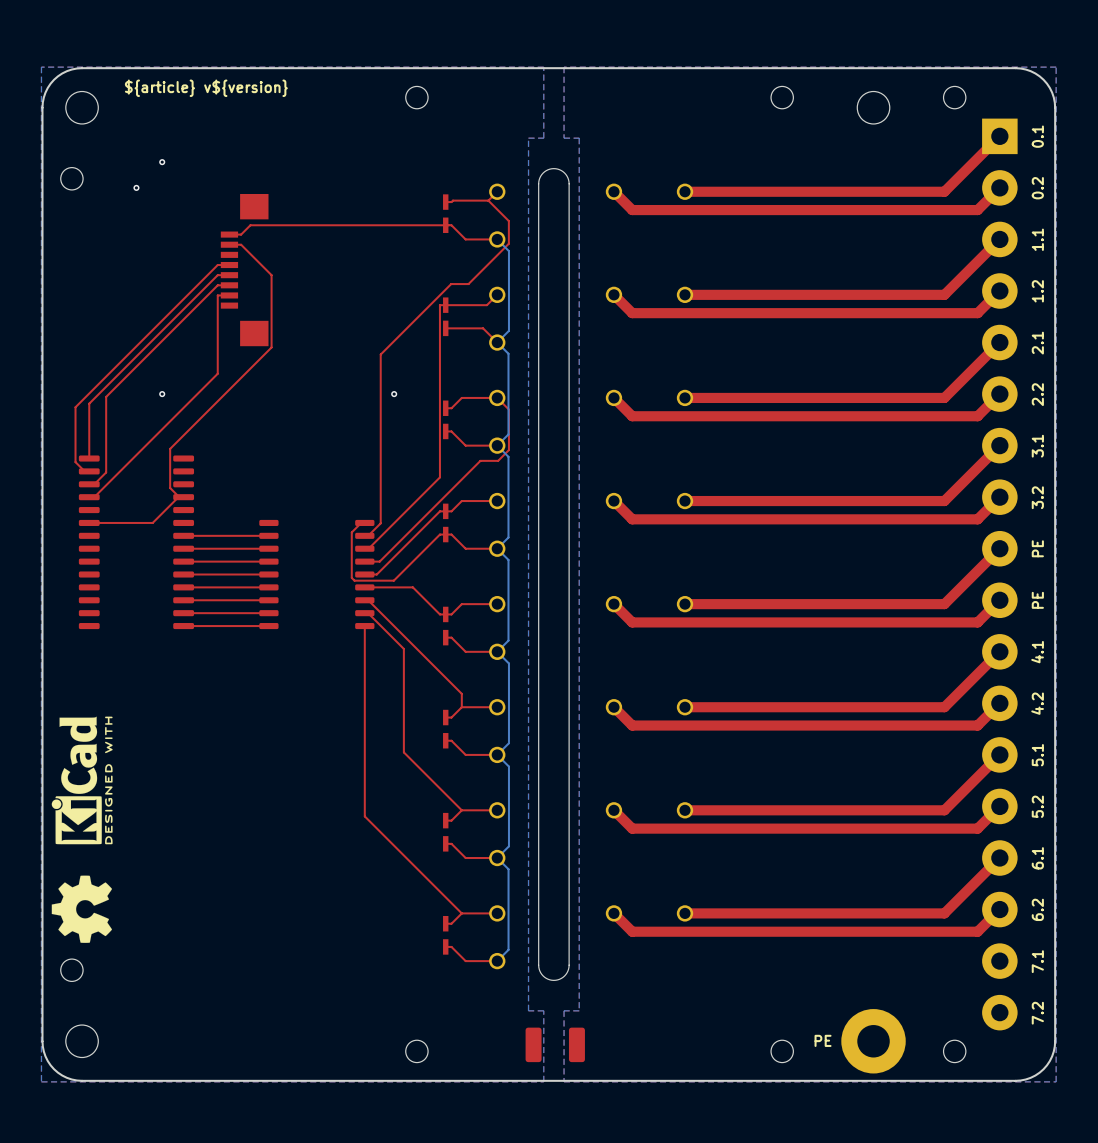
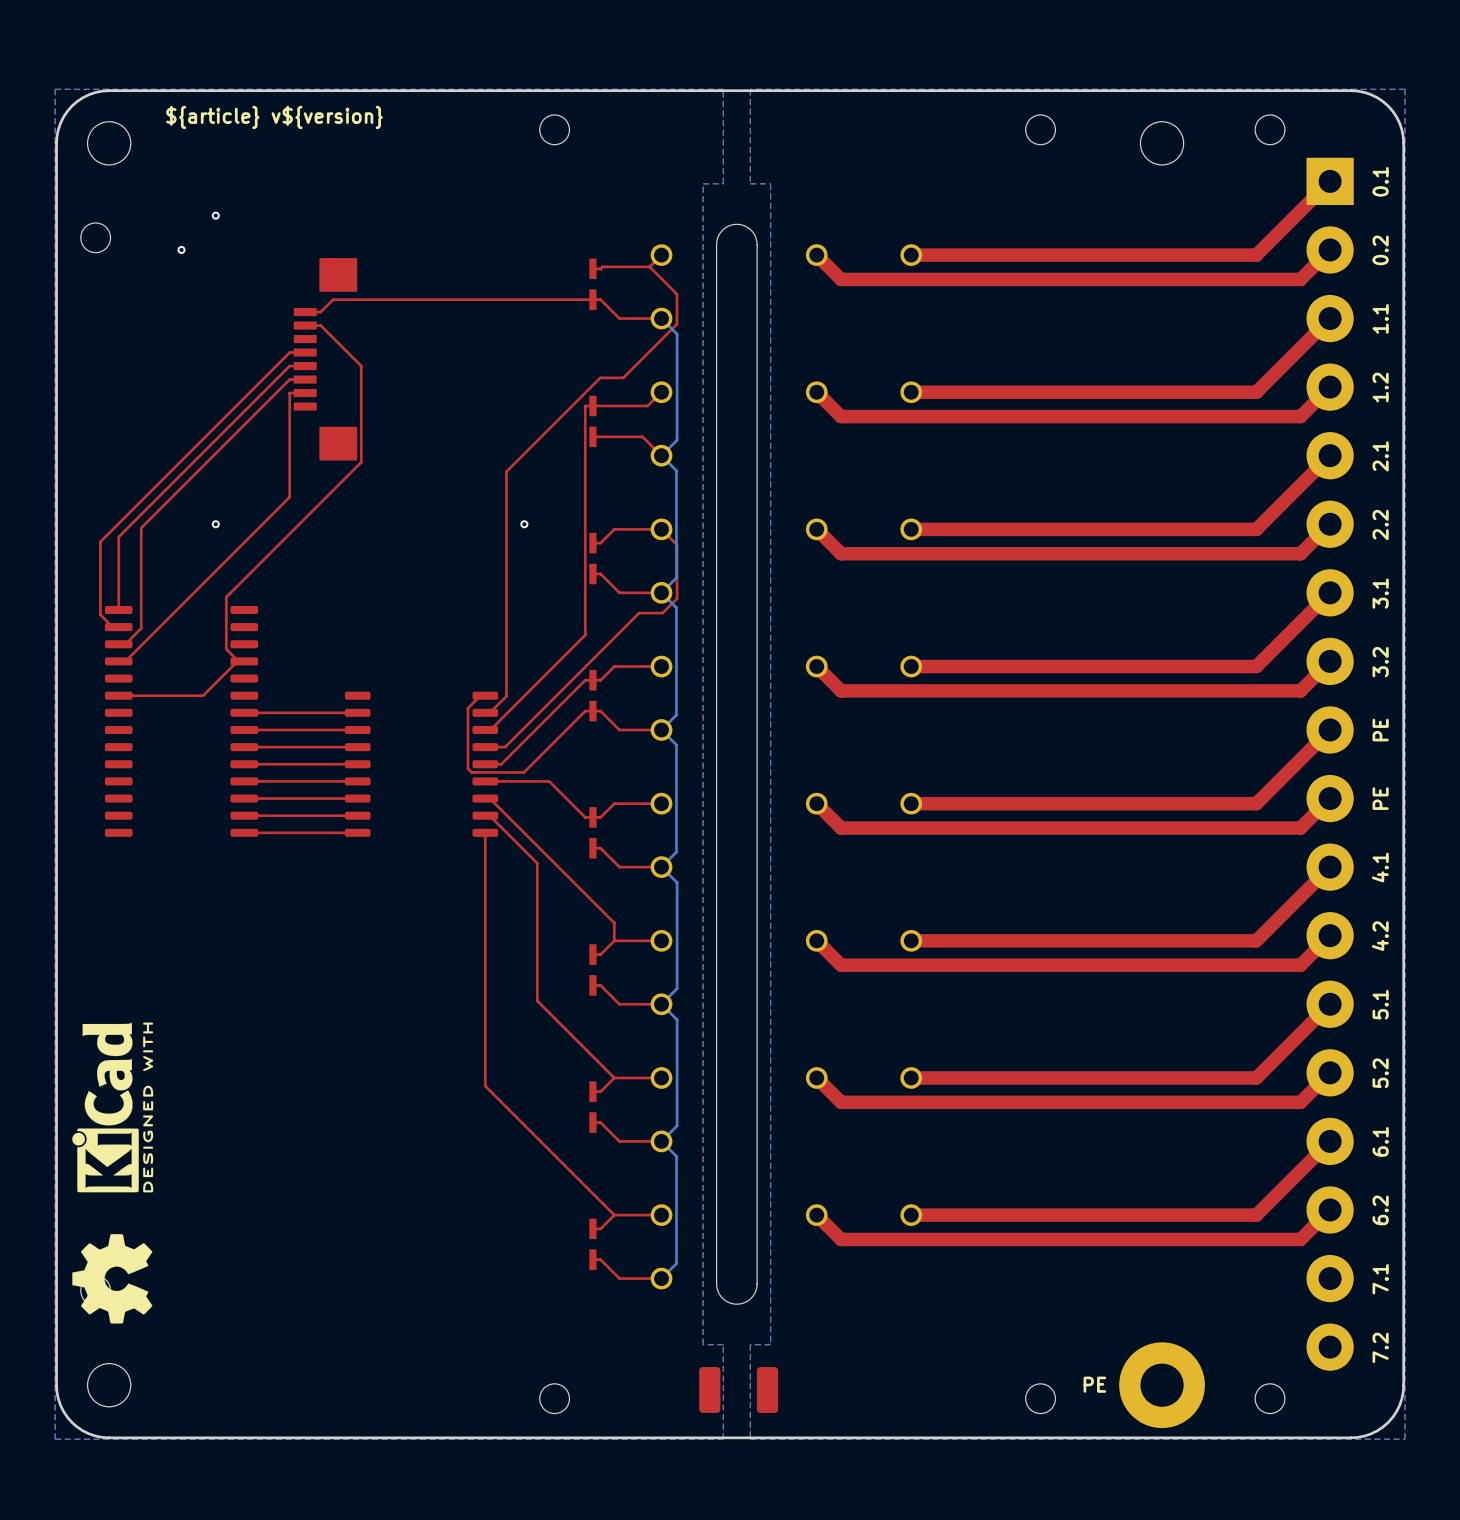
drawing position: (82, 780) -> (112, 1107)
drawing position: (81, 909) -> (112, 1278)

